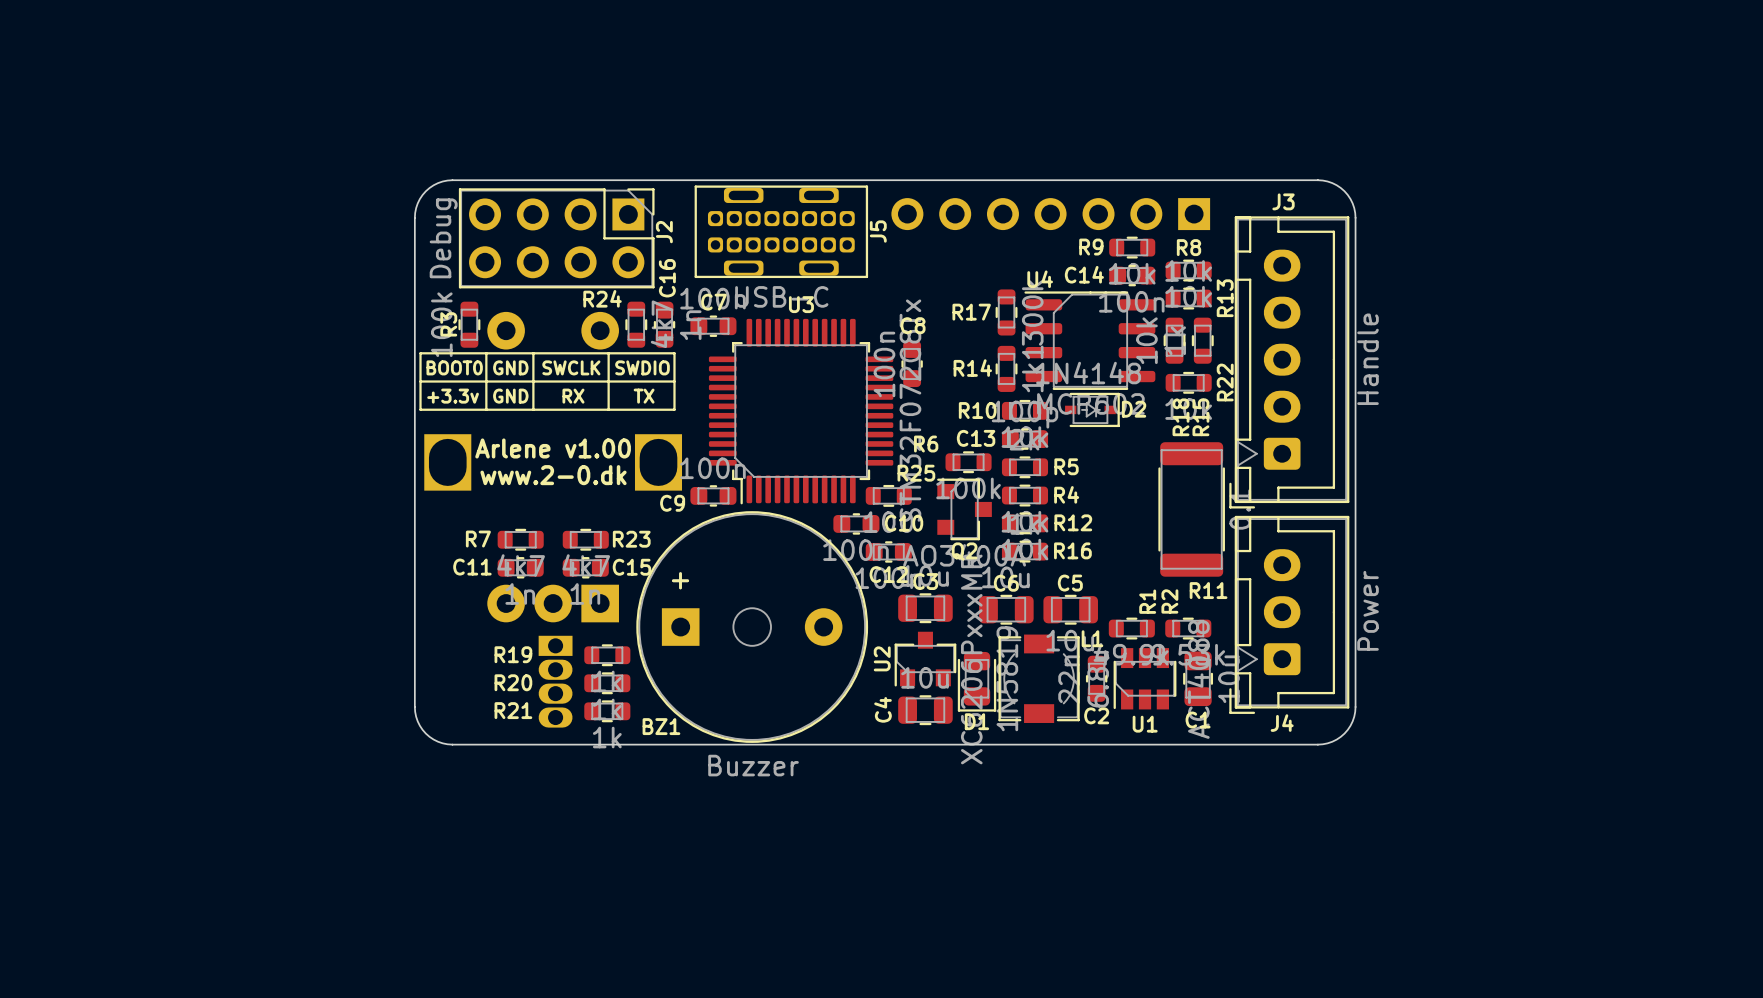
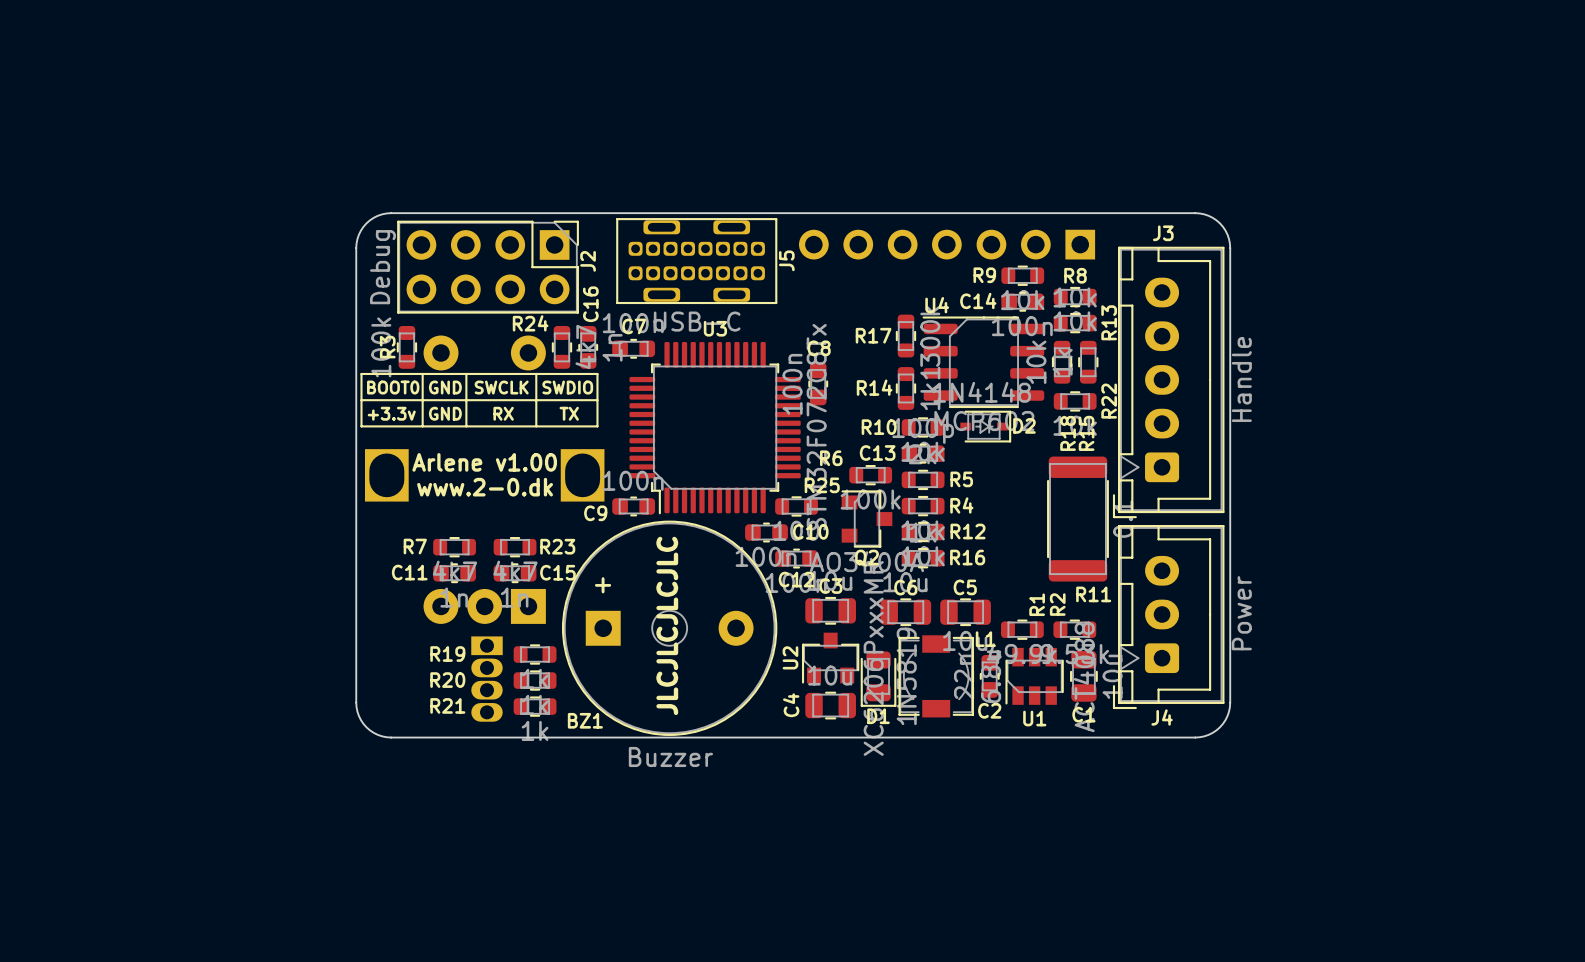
text: none -> JLCJLCJLCJLC (667, 625)

